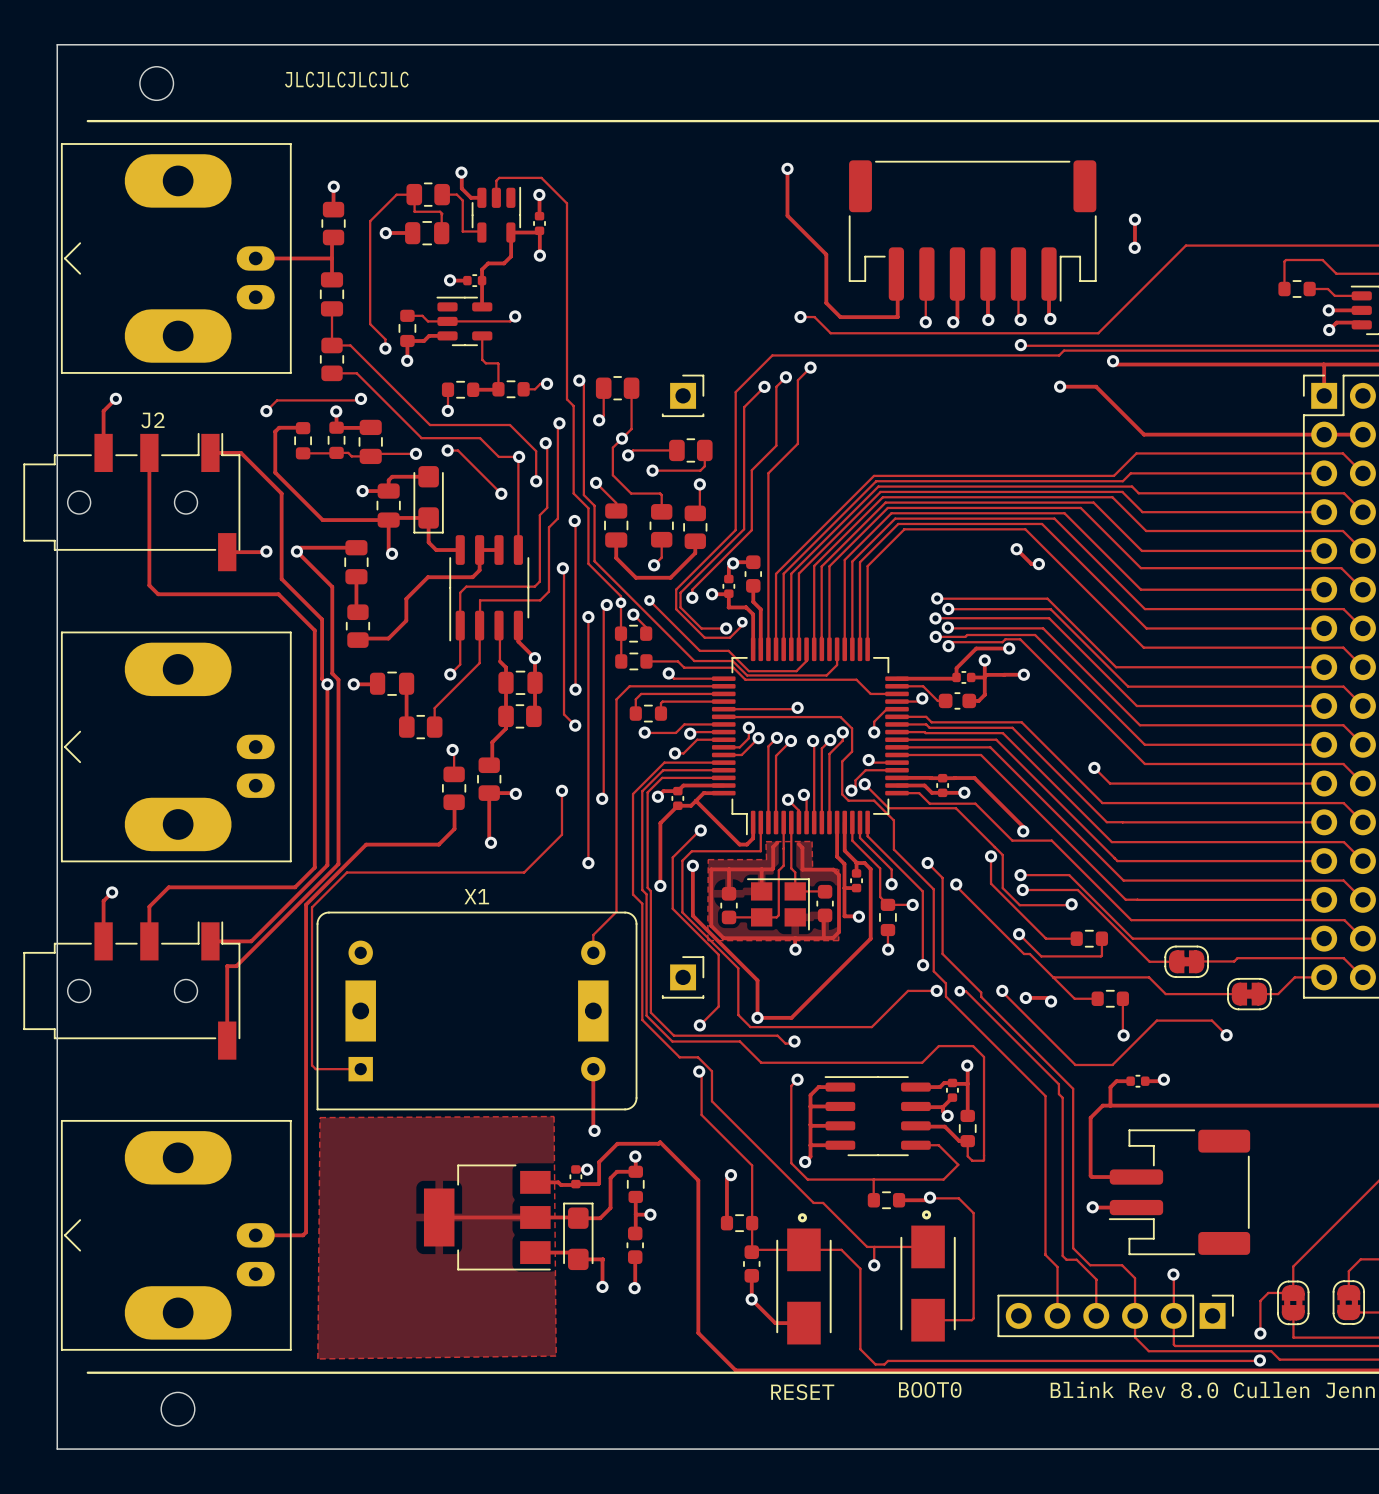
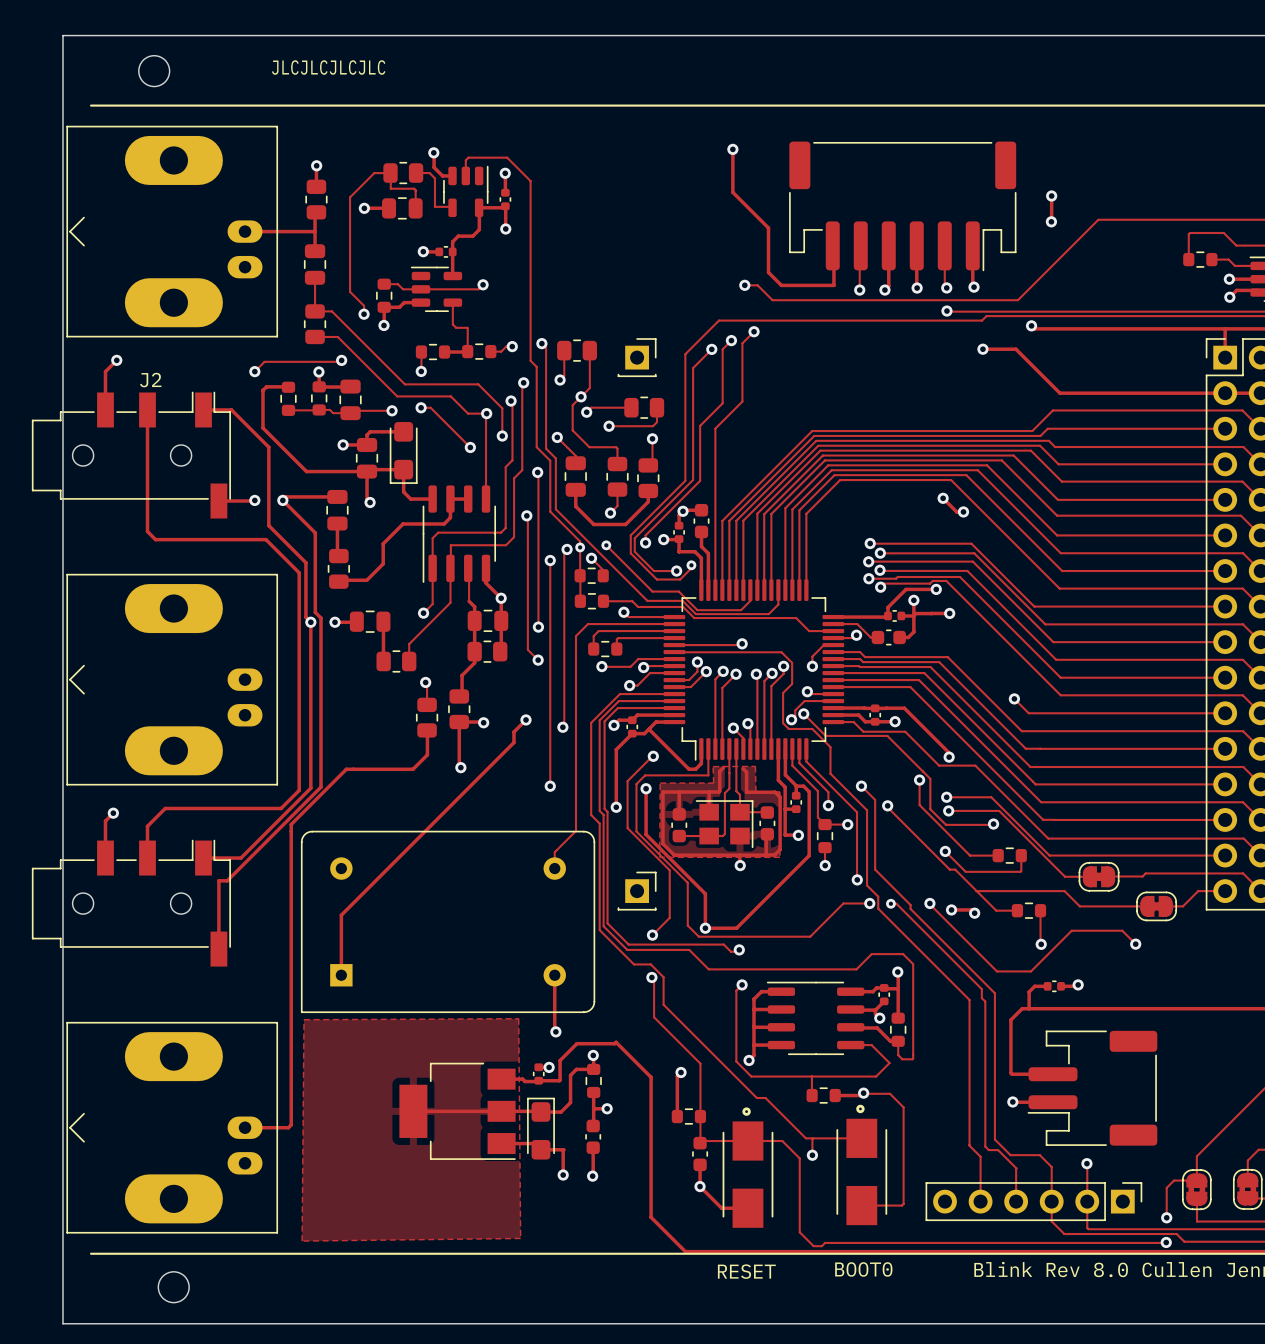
track: (561, 790) (561, 834) (524, 872) (346, 872) (312, 907) (312, 1065) (315, 1069) (360, 1069) -> (526, 719) (513, 731) (513, 742) (341, 915) (341, 975)
X1: (477, 1010) -> none
part: none -> (448, 921)

